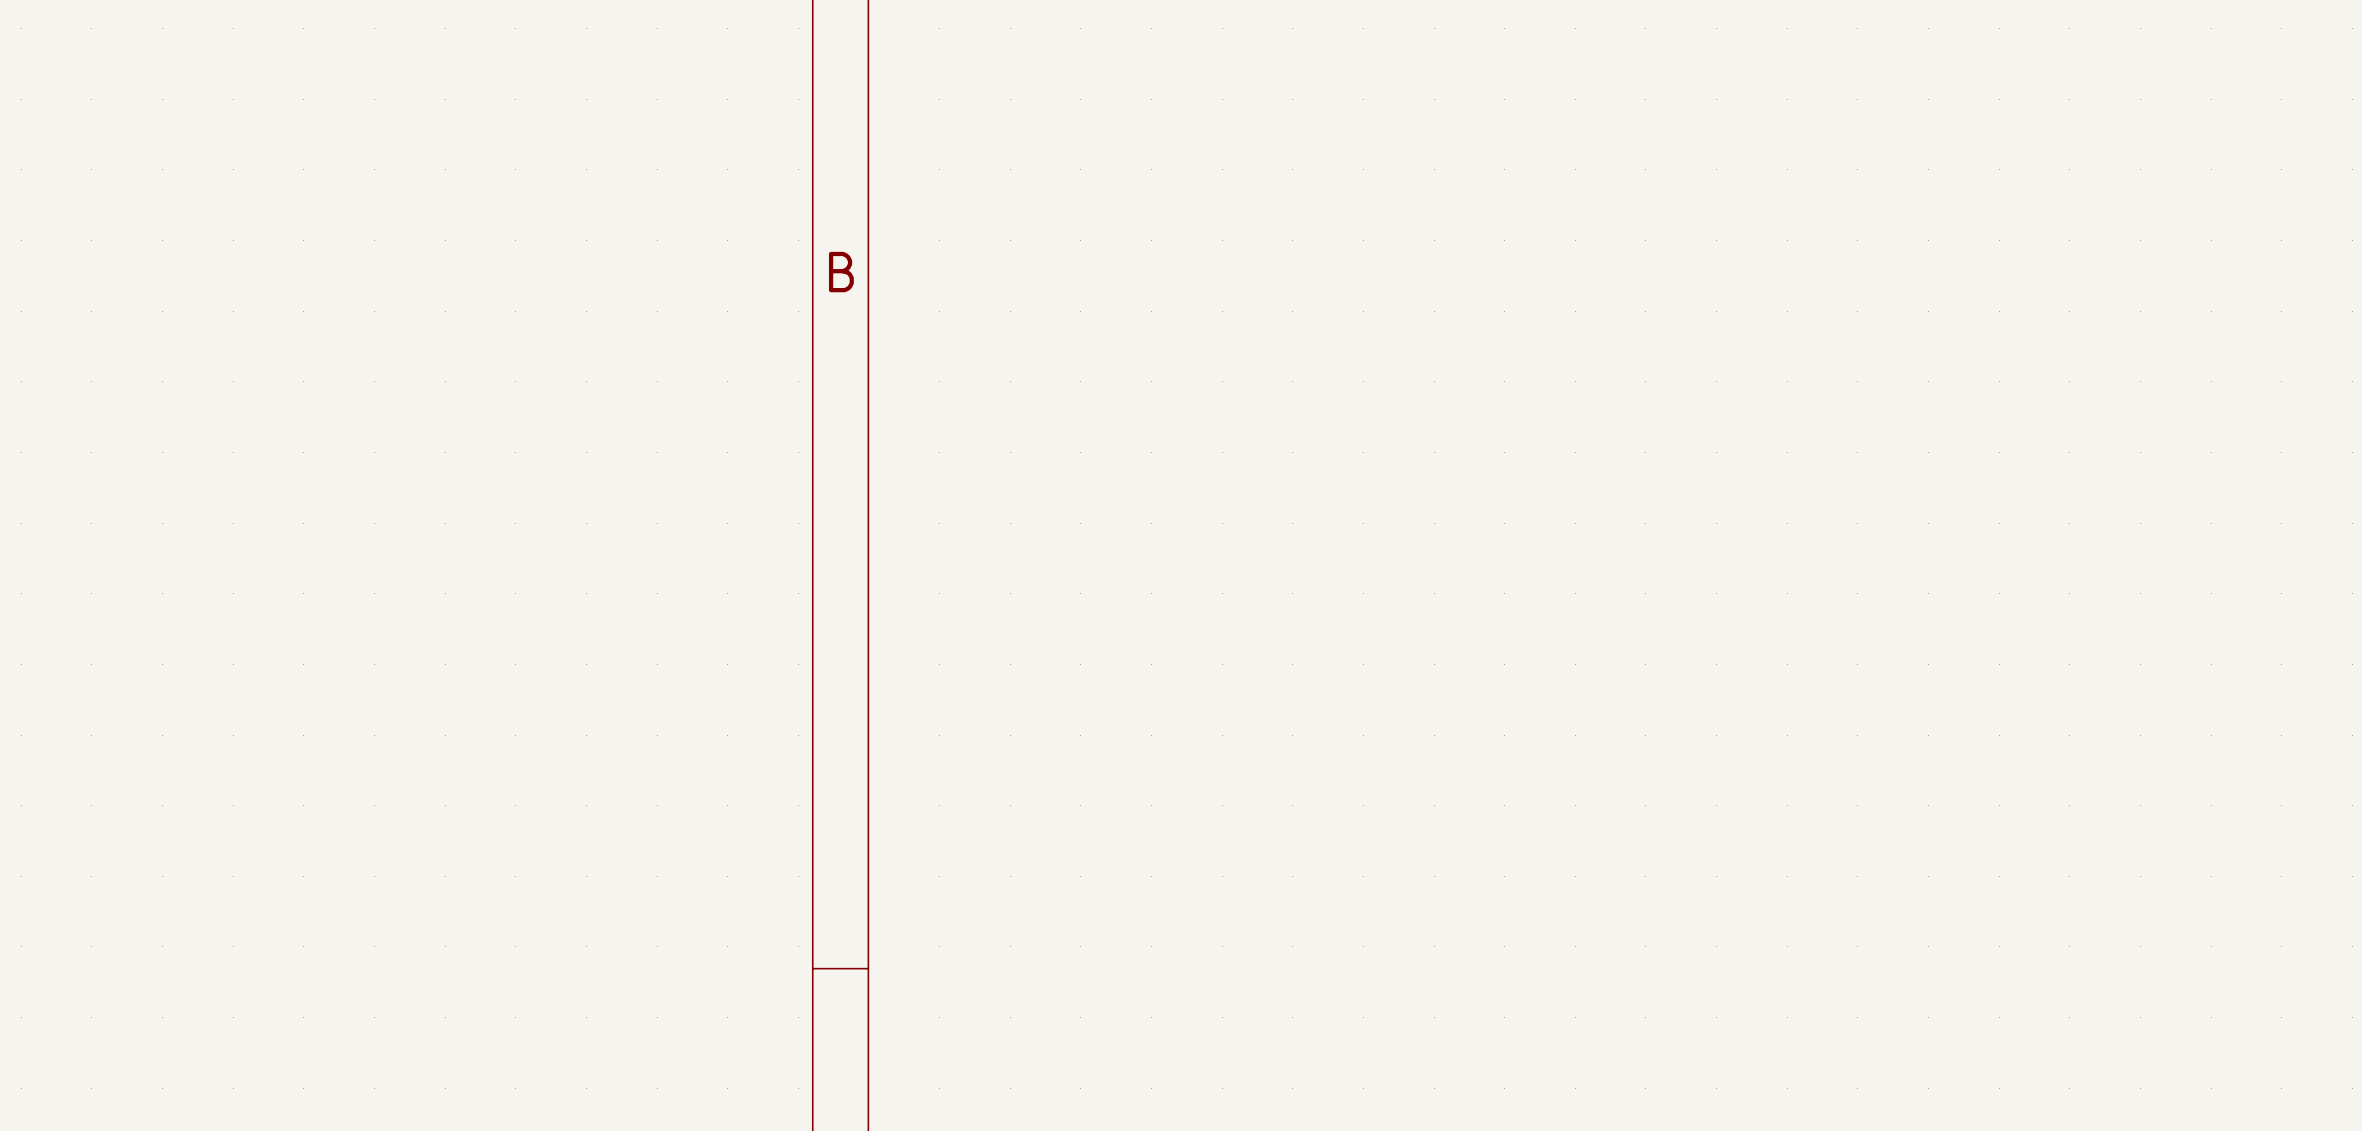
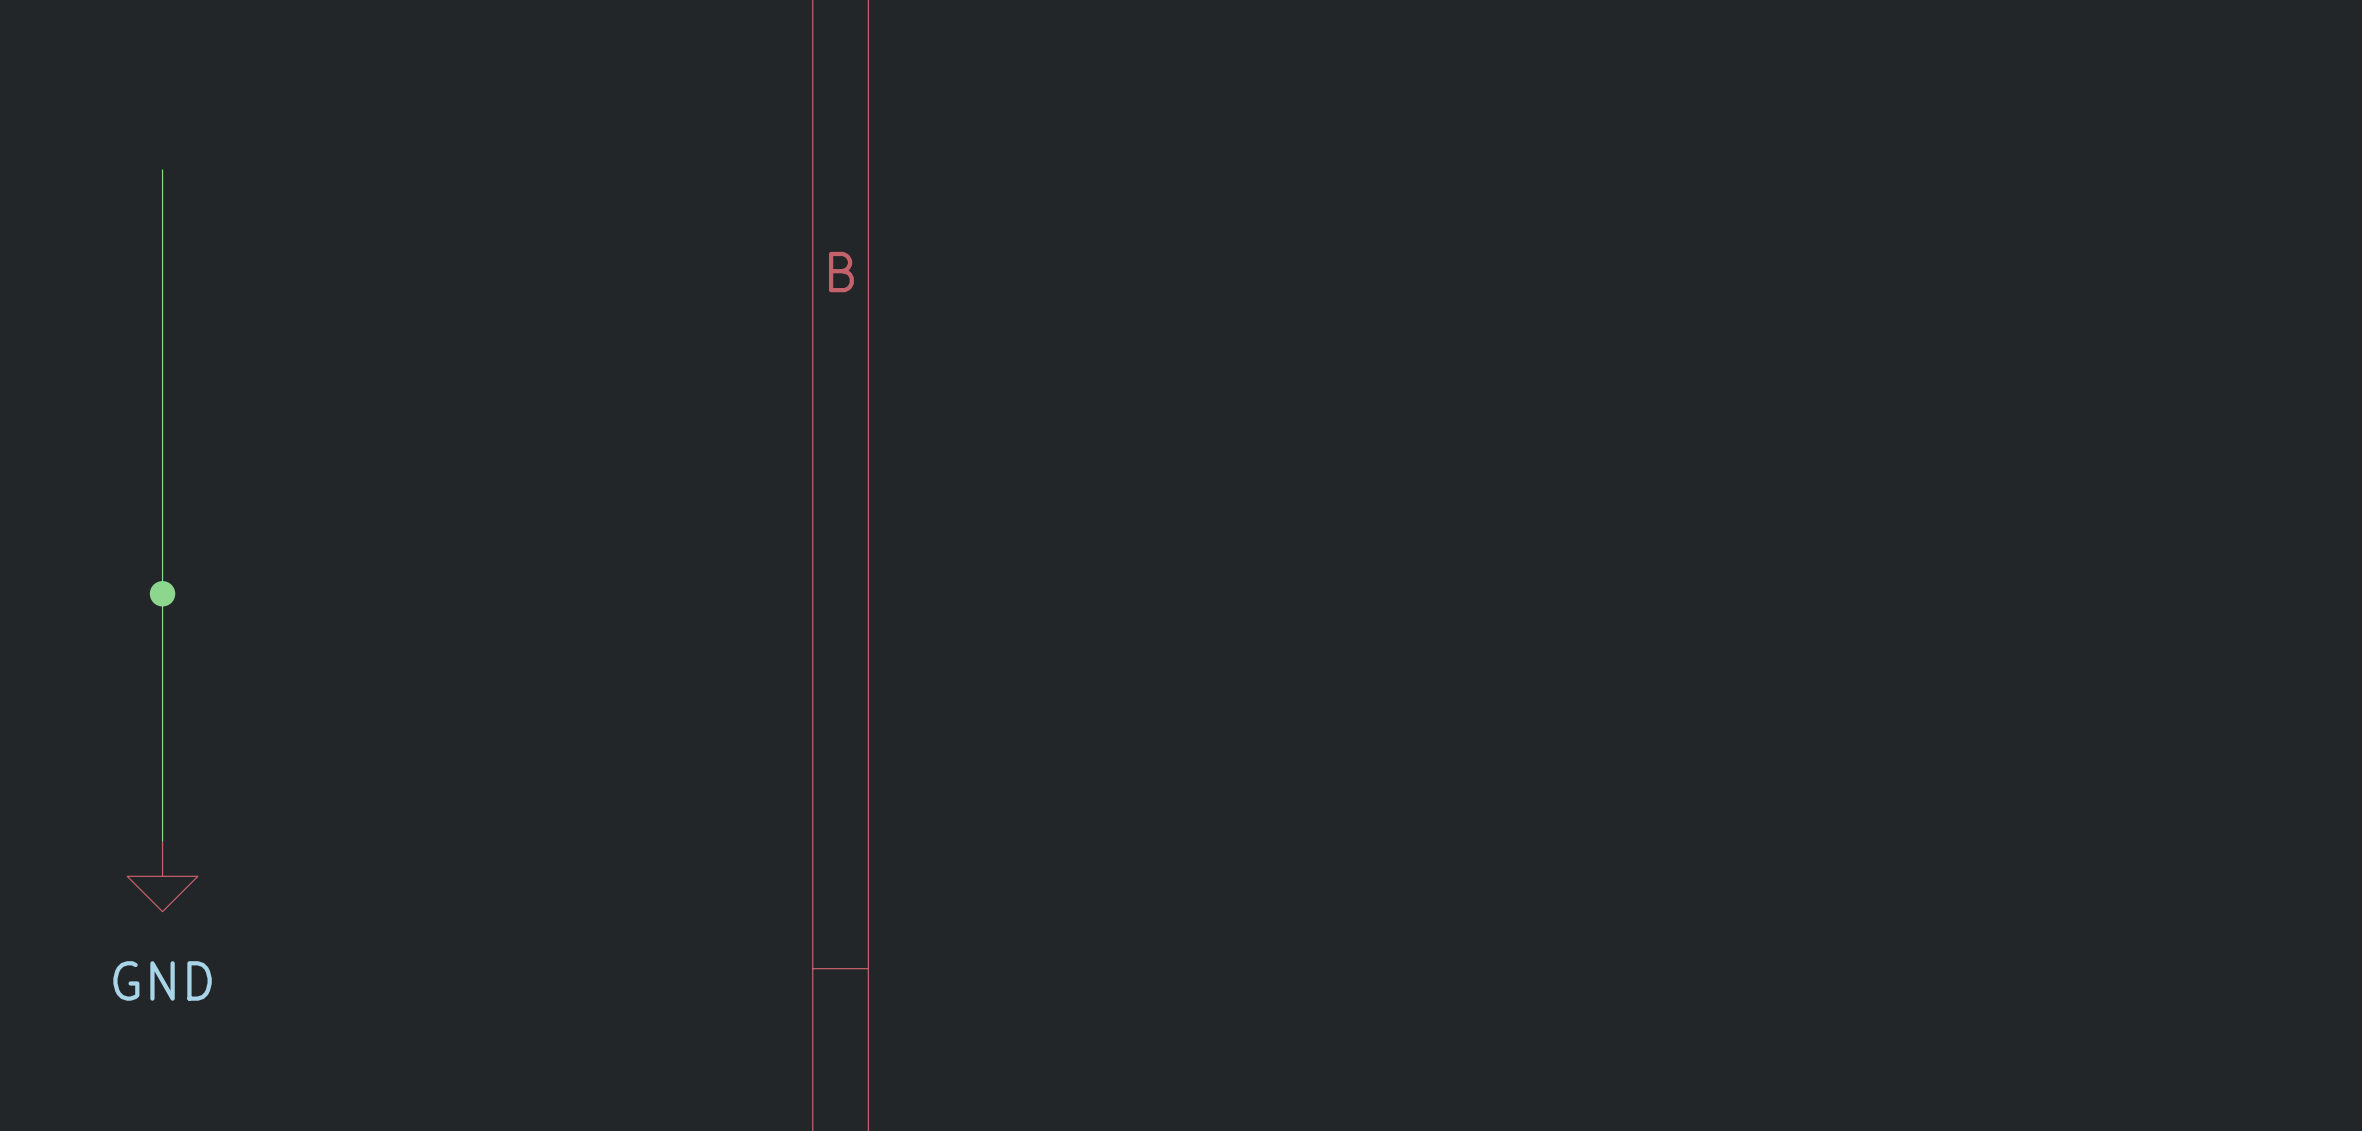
wire: none -> (162, 169) (162, 841)
junction: none -> (162, 593)
power symbol: none -> GND (162, 876)

